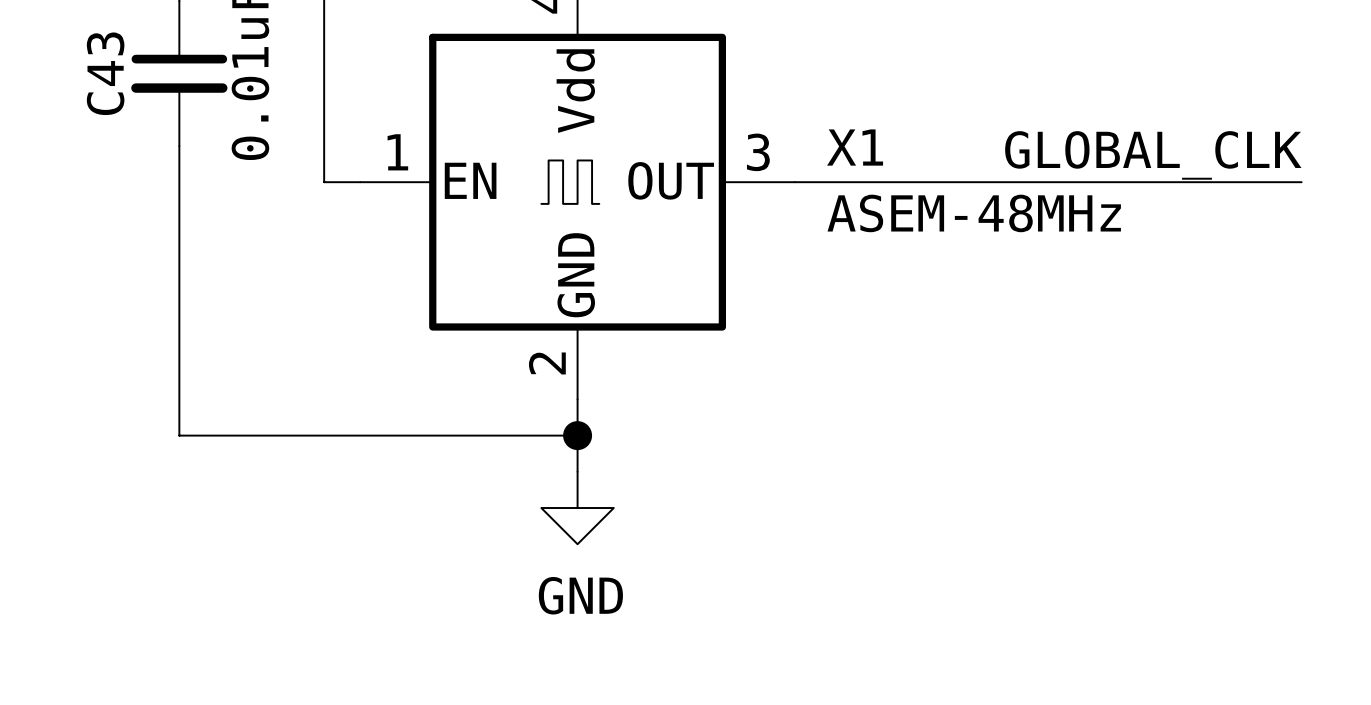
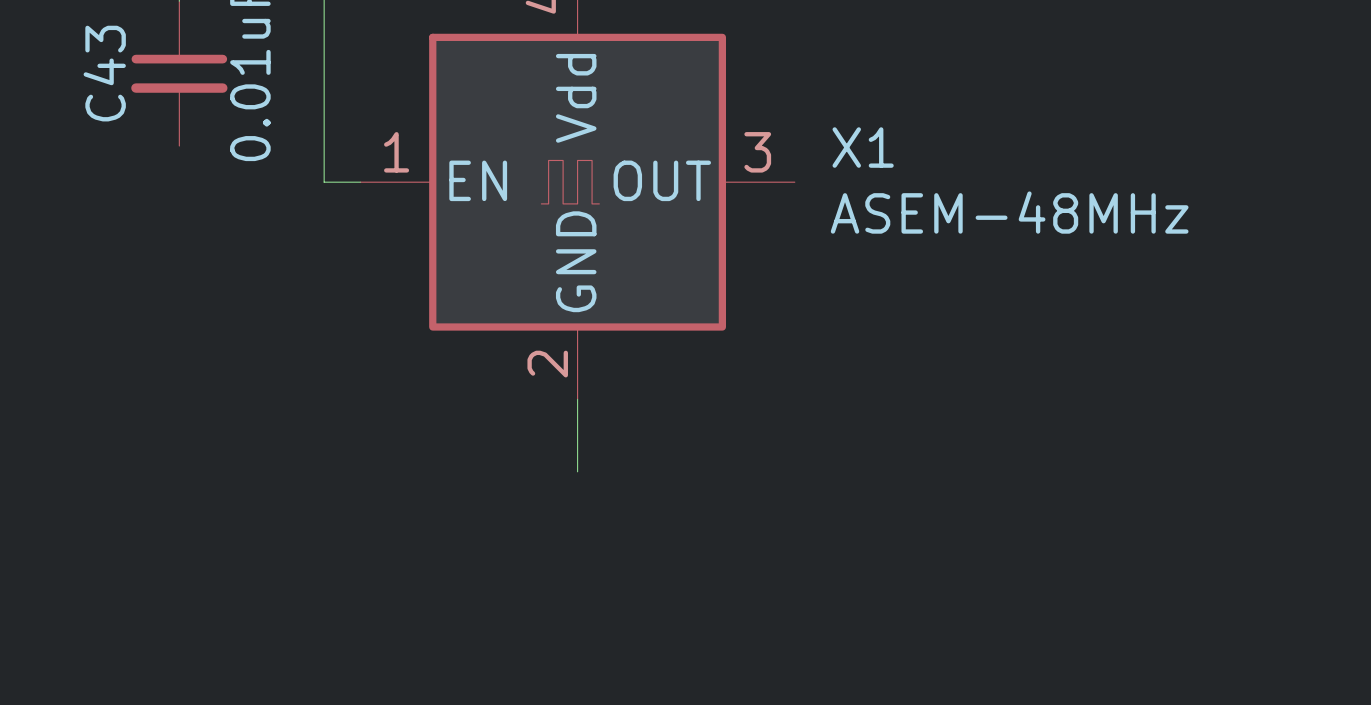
wire: (179, 145) (179, 435) (577, 435) -> none
label: GLOBAL_CLK (1153, 155) -> none
wire: (794, 182) (1301, 182) -> none
junction: (577, 435) -> none
power symbol: GND (577, 508) -> none

